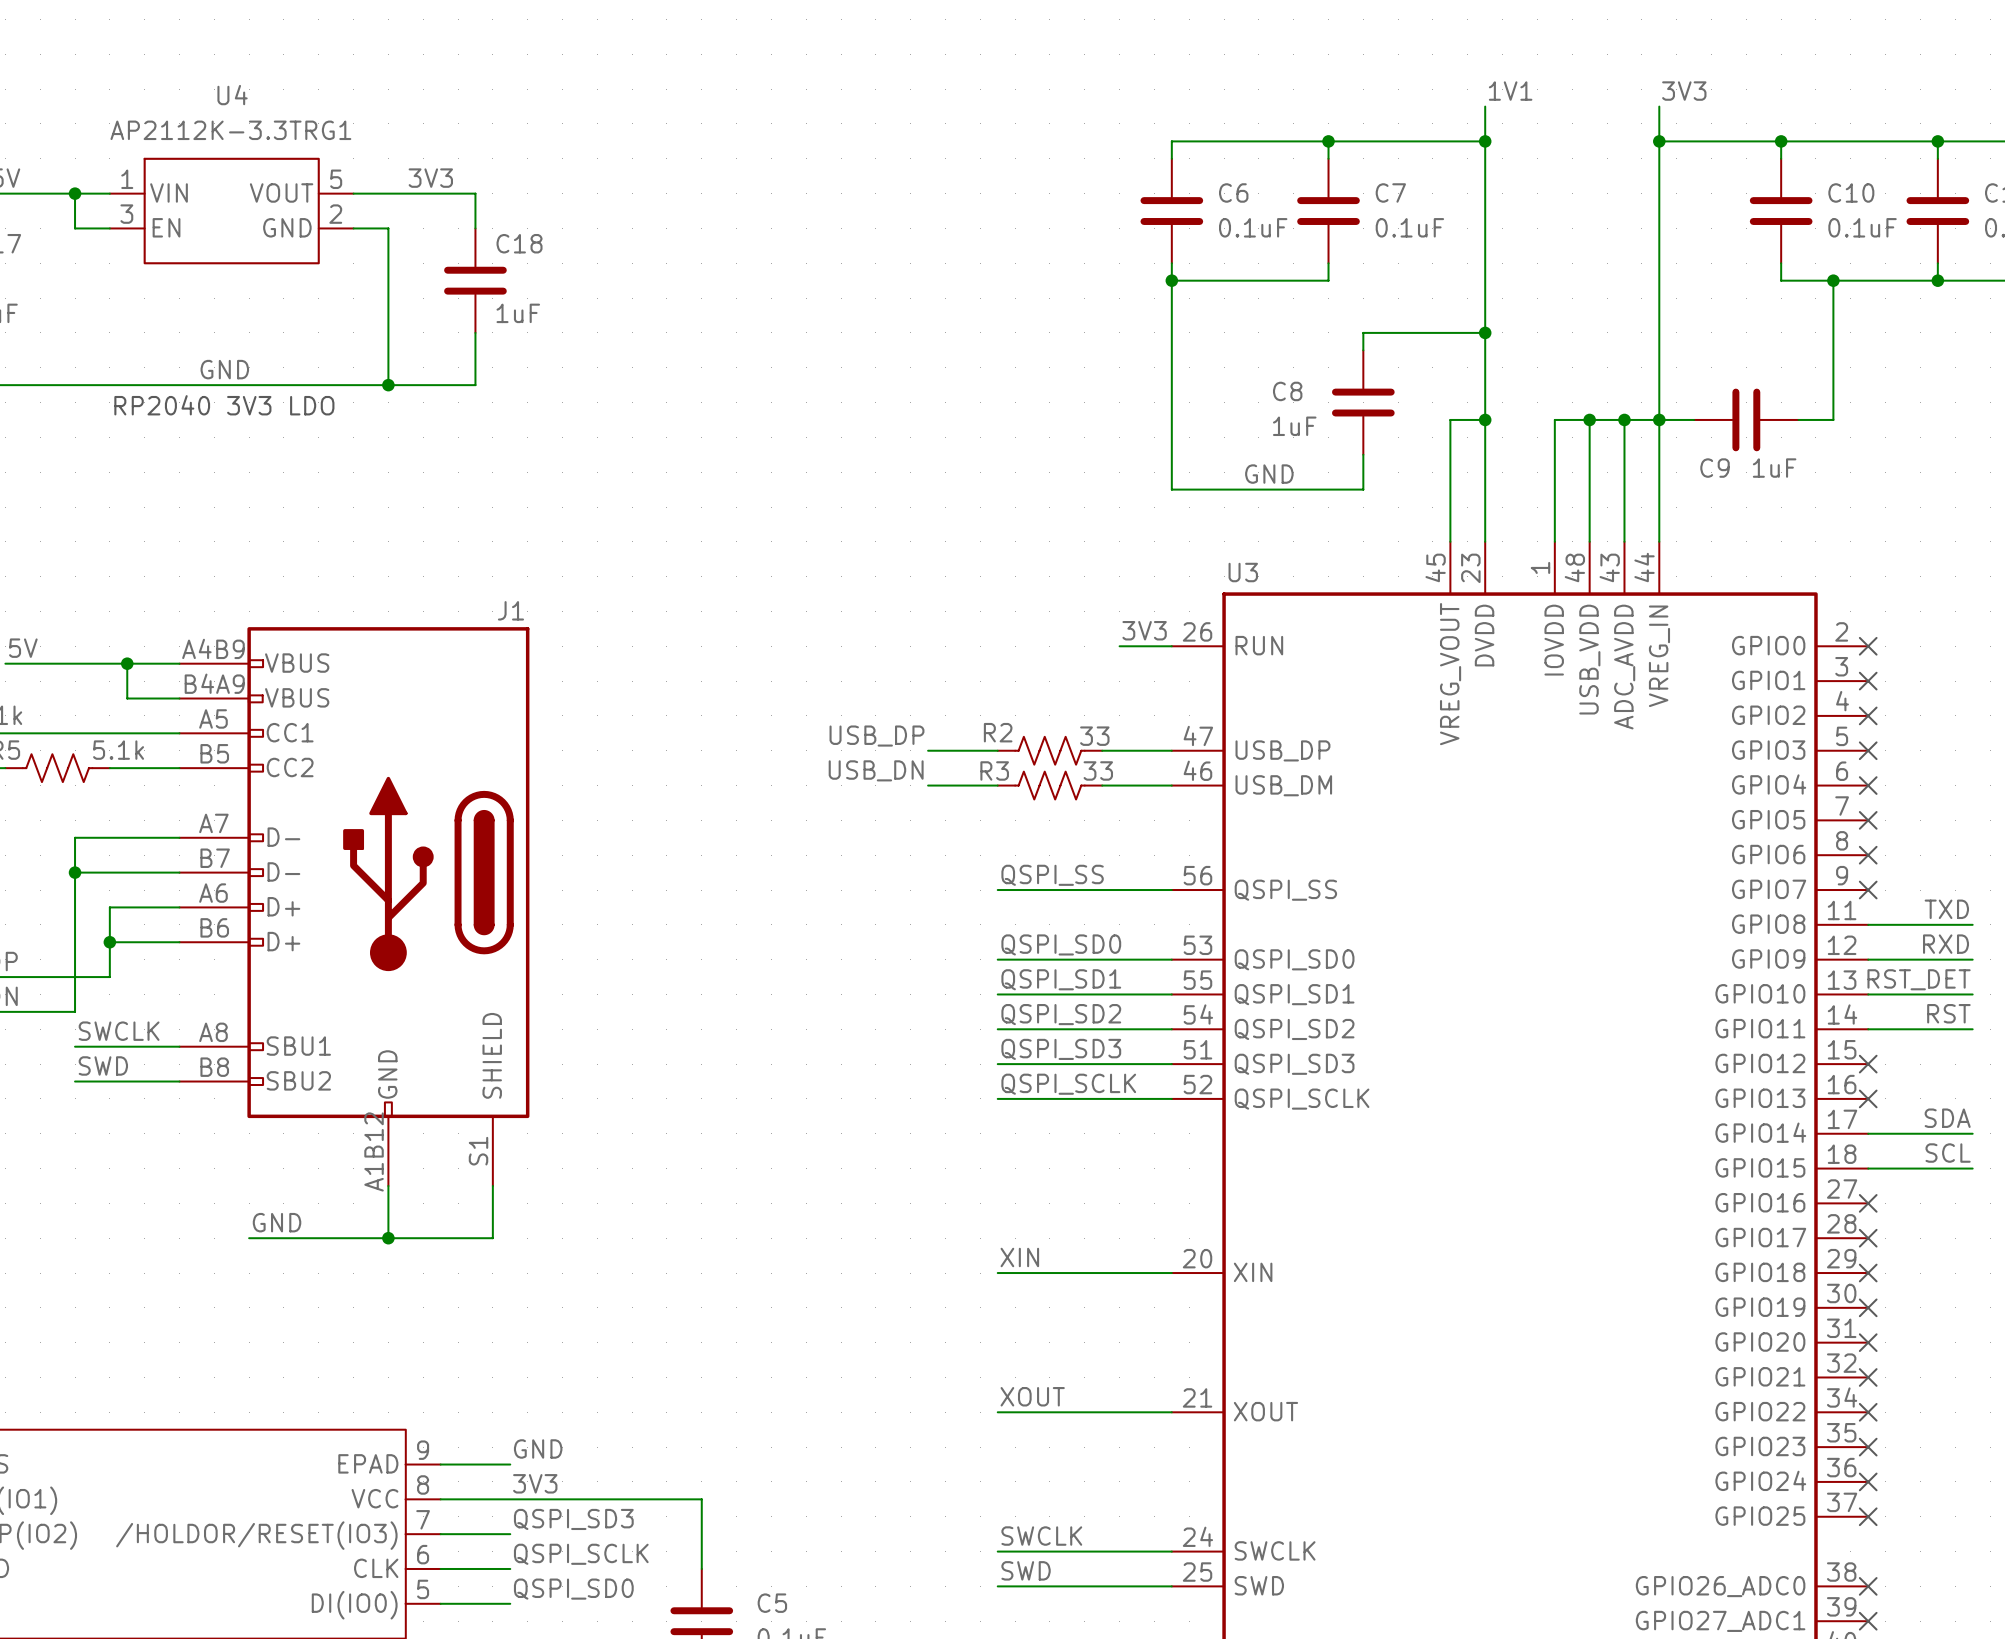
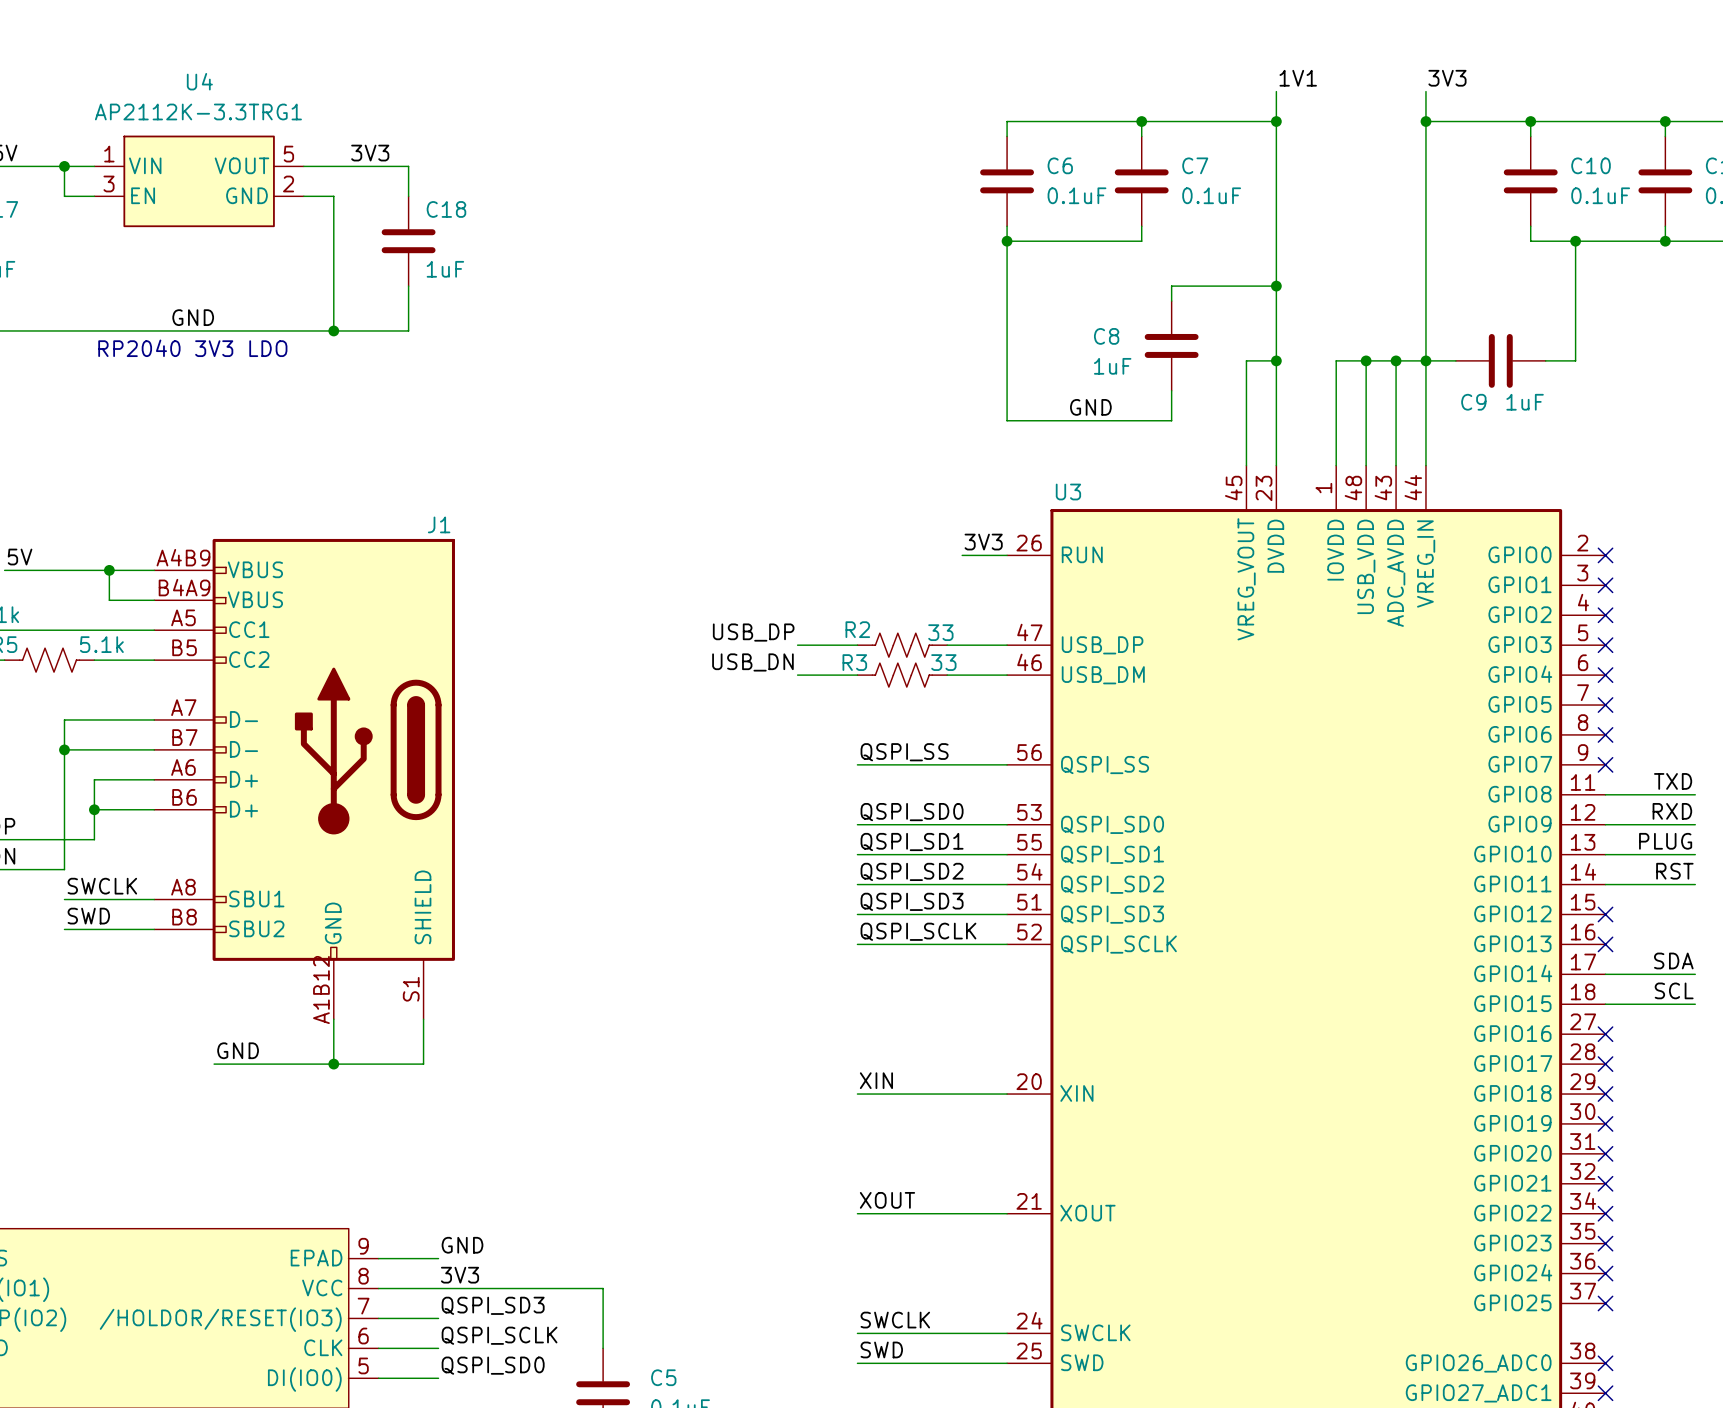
label: RST_DET (1919, 979) -> PLUG (1665, 841)

